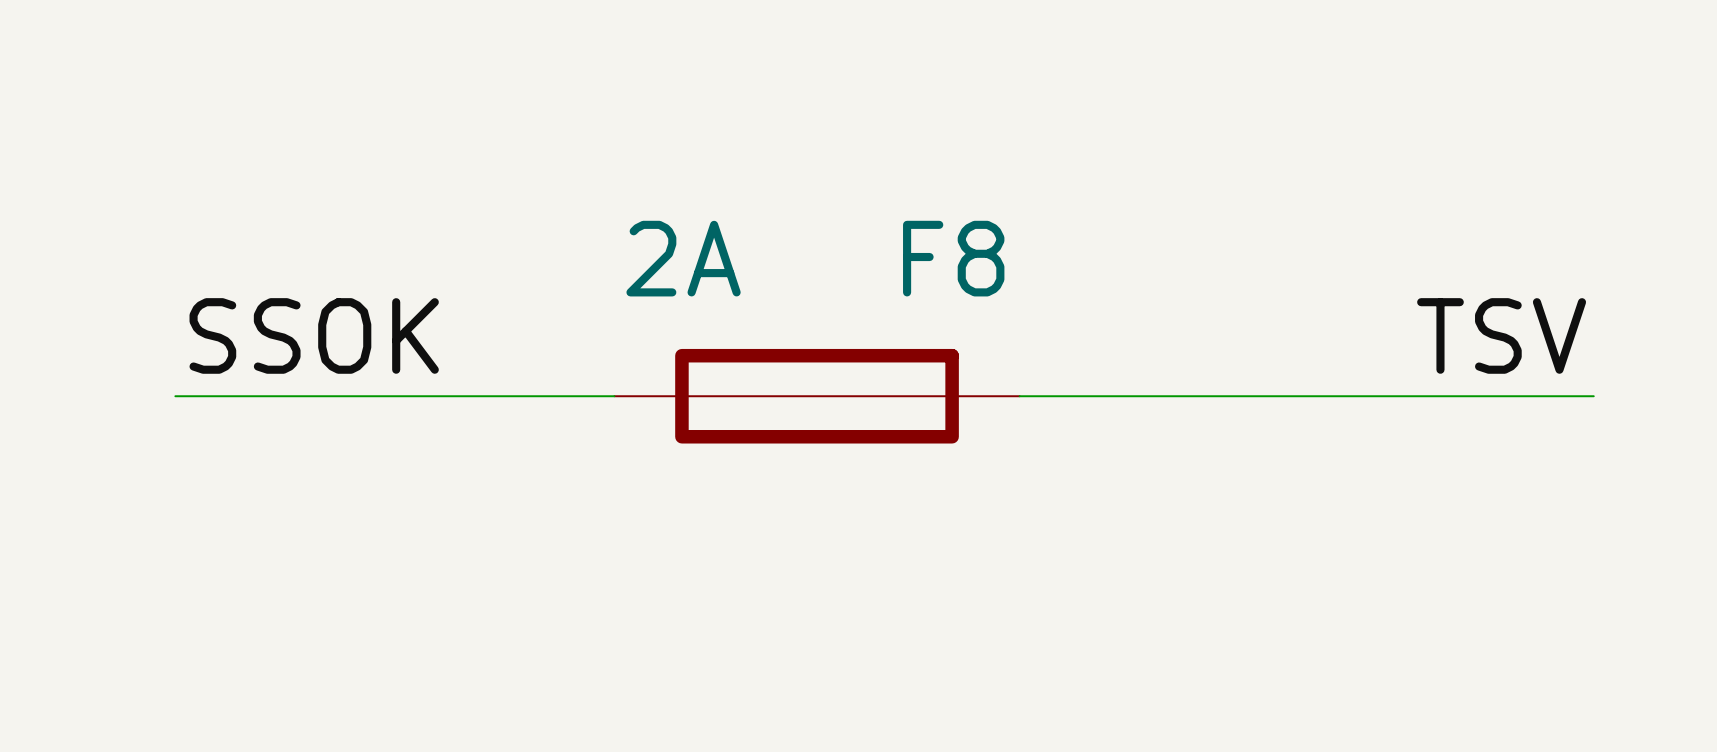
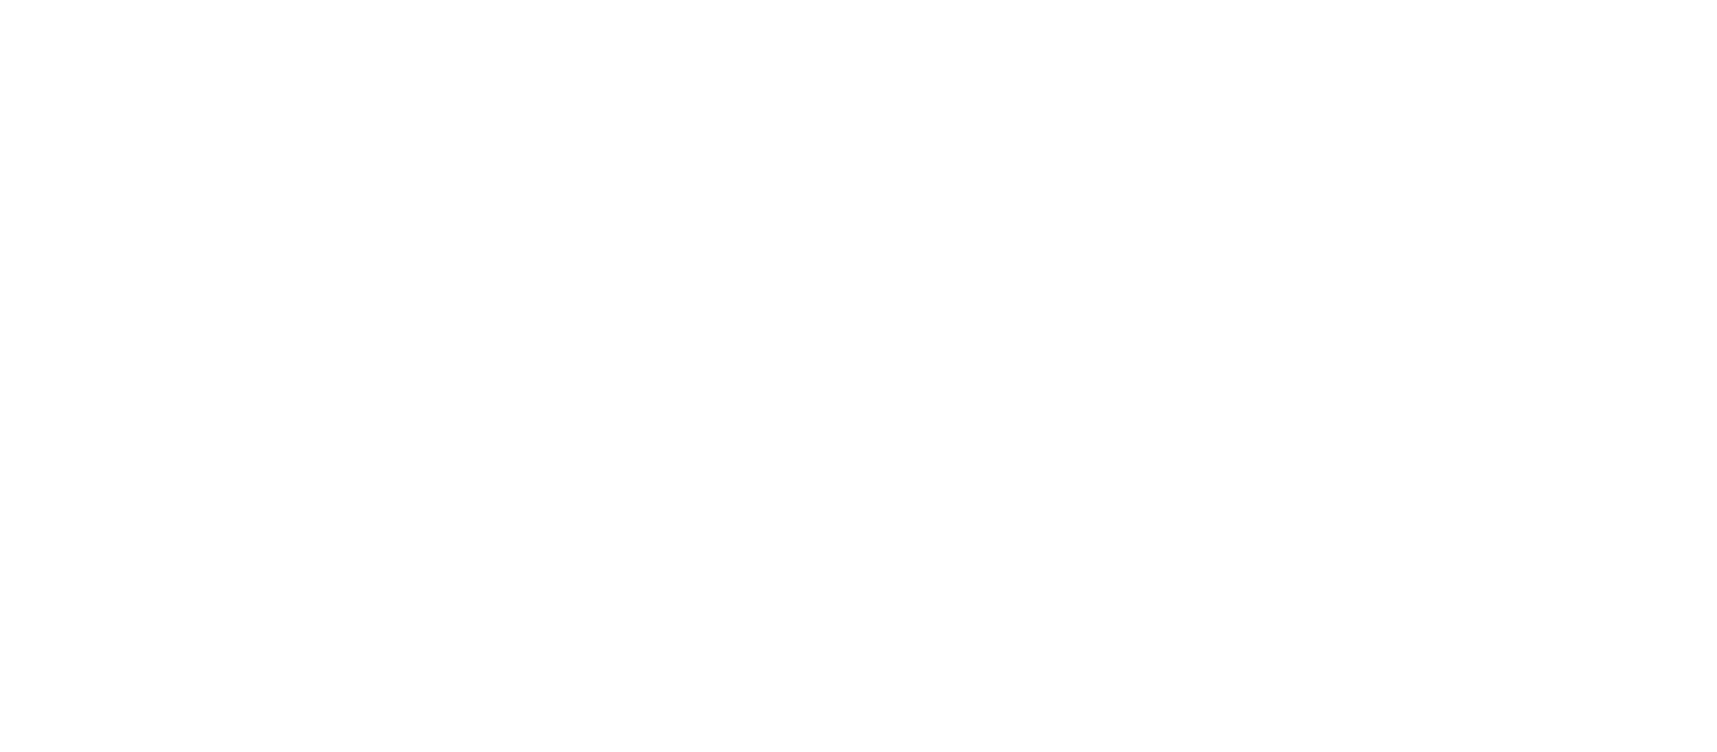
label: SSOK (314, 335) -> none
label: TSV (1501, 335) -> none
wire: (175, 396) (614, 396) -> none
F8: 2A (817, 396) -> none
wire: (1019, 396) (1593, 396) -> none

